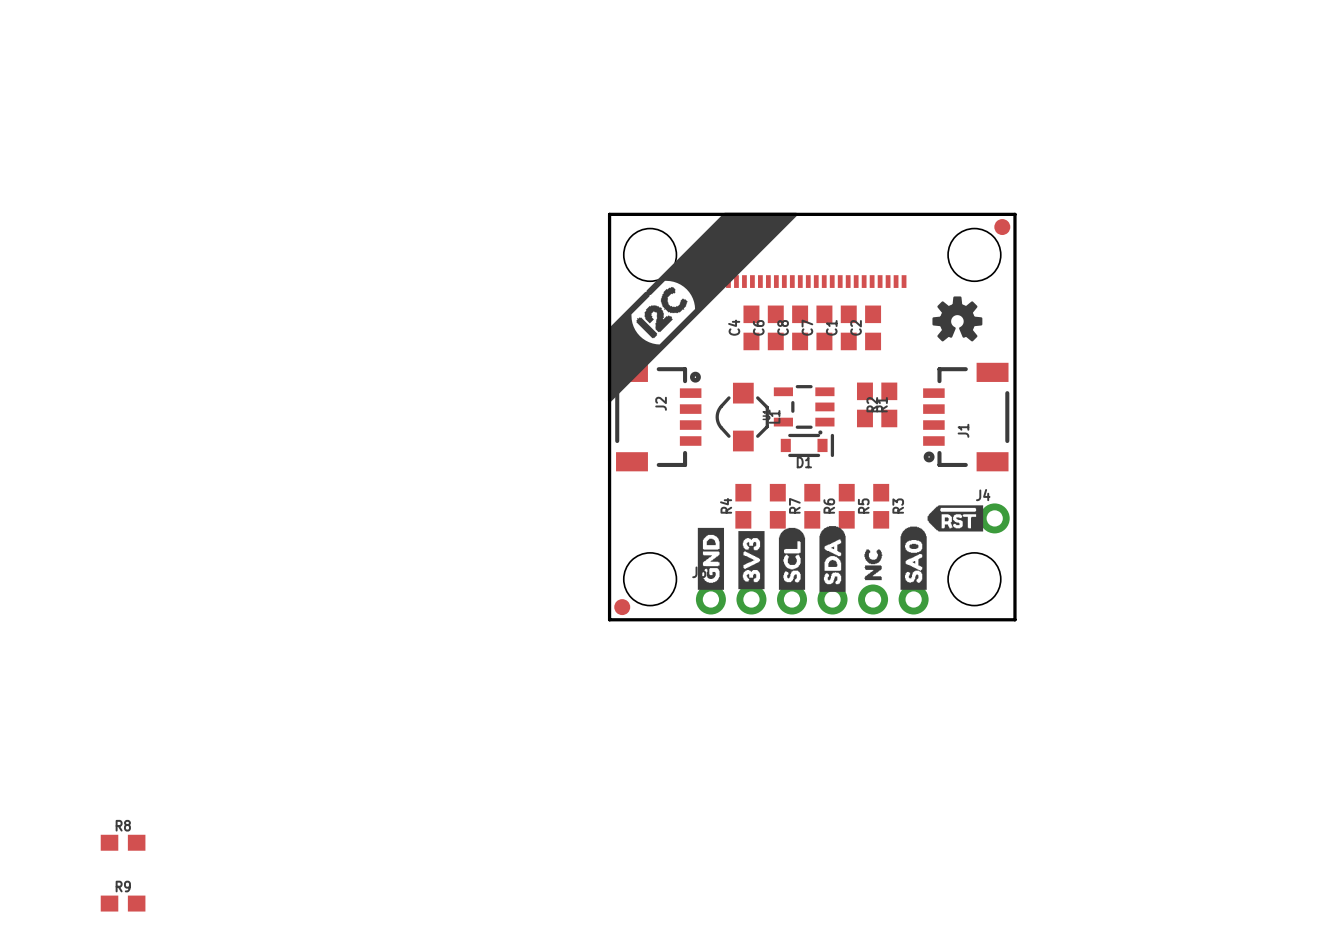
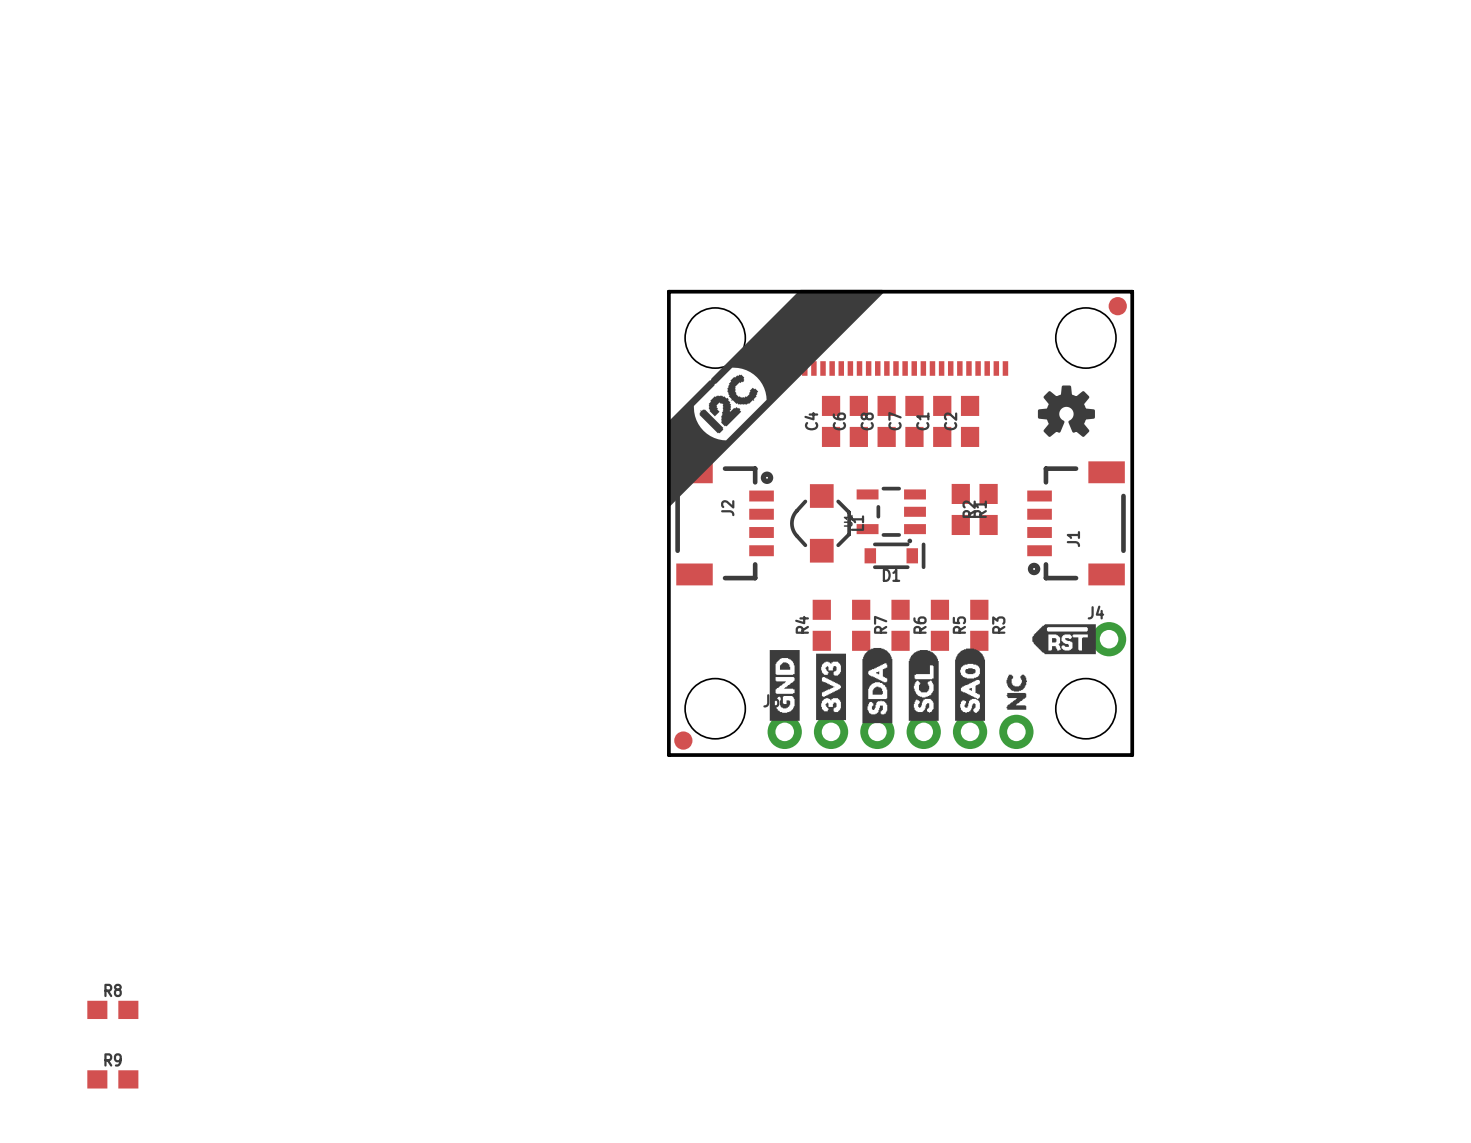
drawing position: (792, 558) -> (923, 685)
drawing position: (832, 558) -> (877, 685)
drawing position: (913, 558) -> (970, 684)
drawing position: (873, 564) -> (1016, 692)

